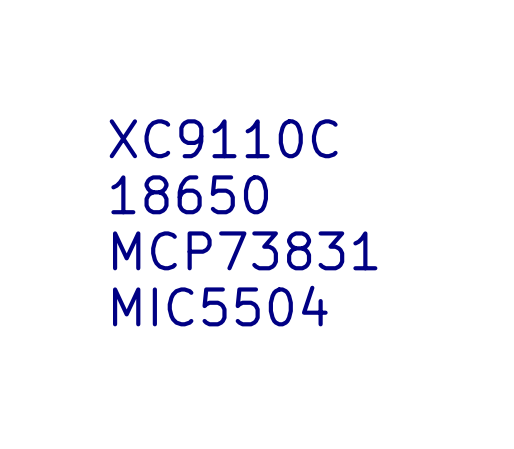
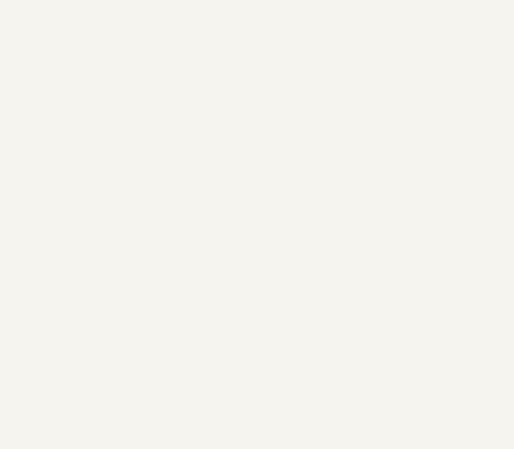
text: XC9110C (223, 138) -> none
text: 18650 (189, 194) -> none
text: MCP73831 (245, 250) -> none
text: MIC5504 (220, 306) -> none

